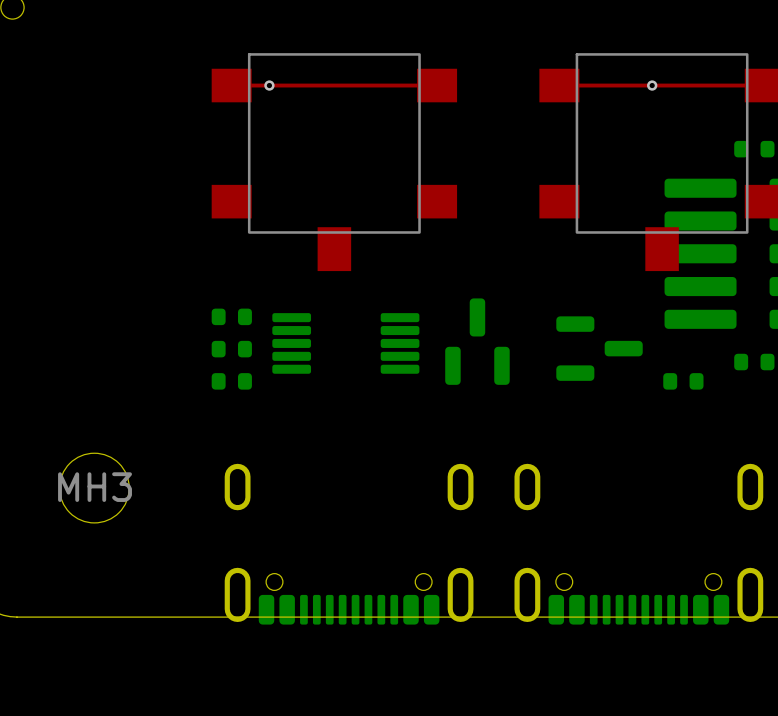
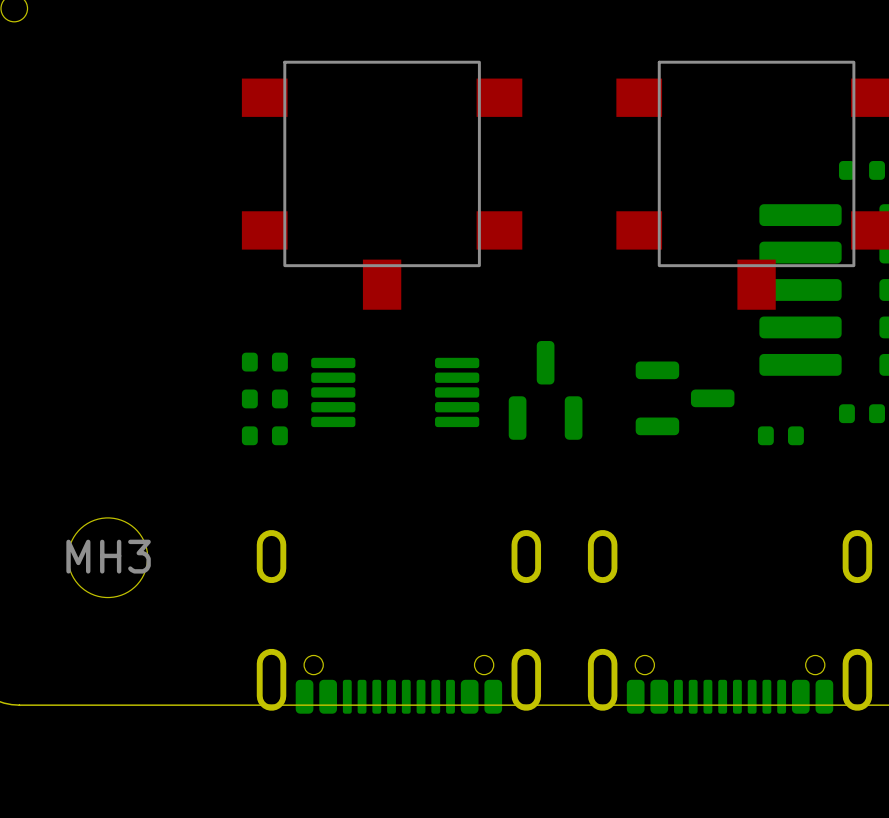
top track: (231, 85) (437, 85) -> none
via: (269, 85) -> none
top track: (559, 85) (764, 85) -> none
via: (652, 85) -> none

